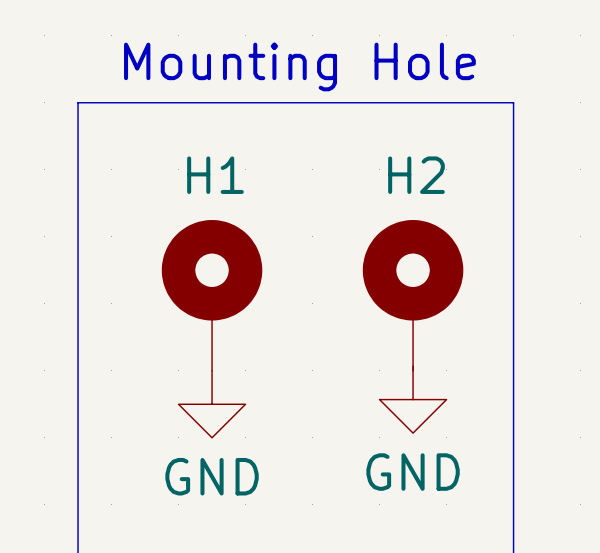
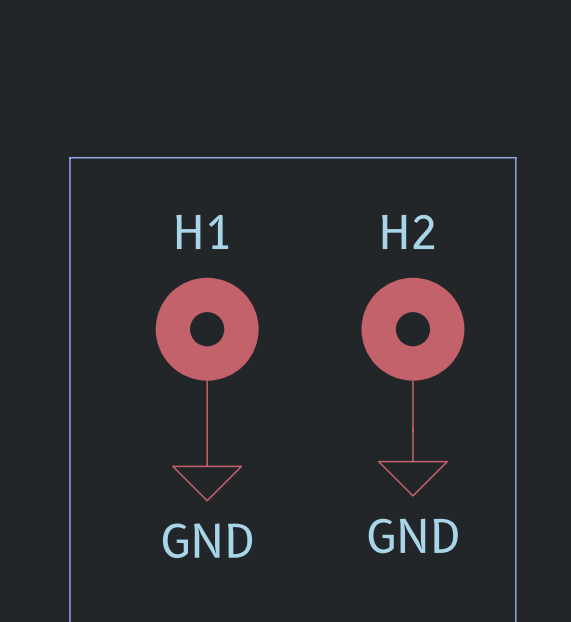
text: Mounting Hole (299, 66) -> none

